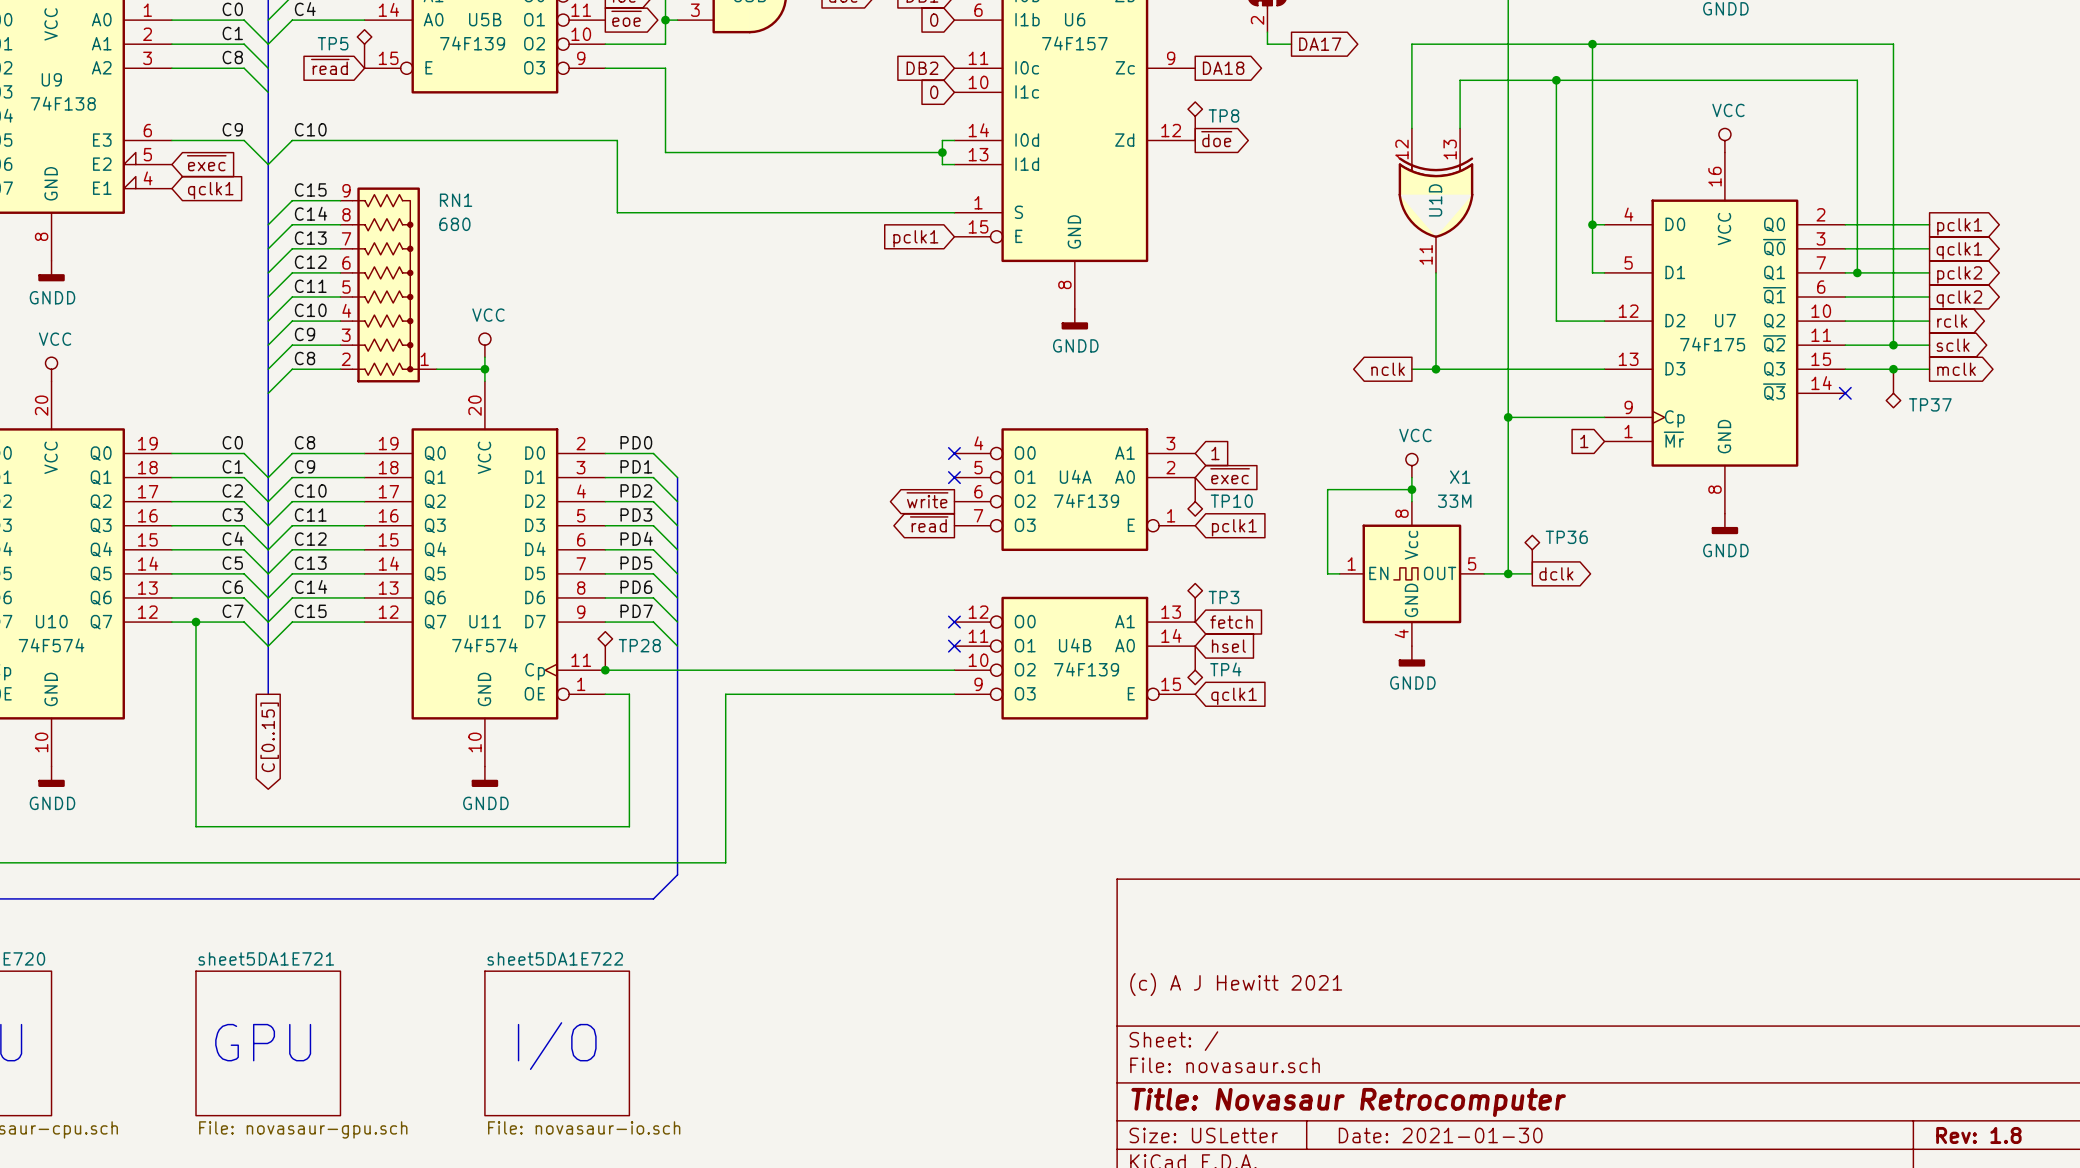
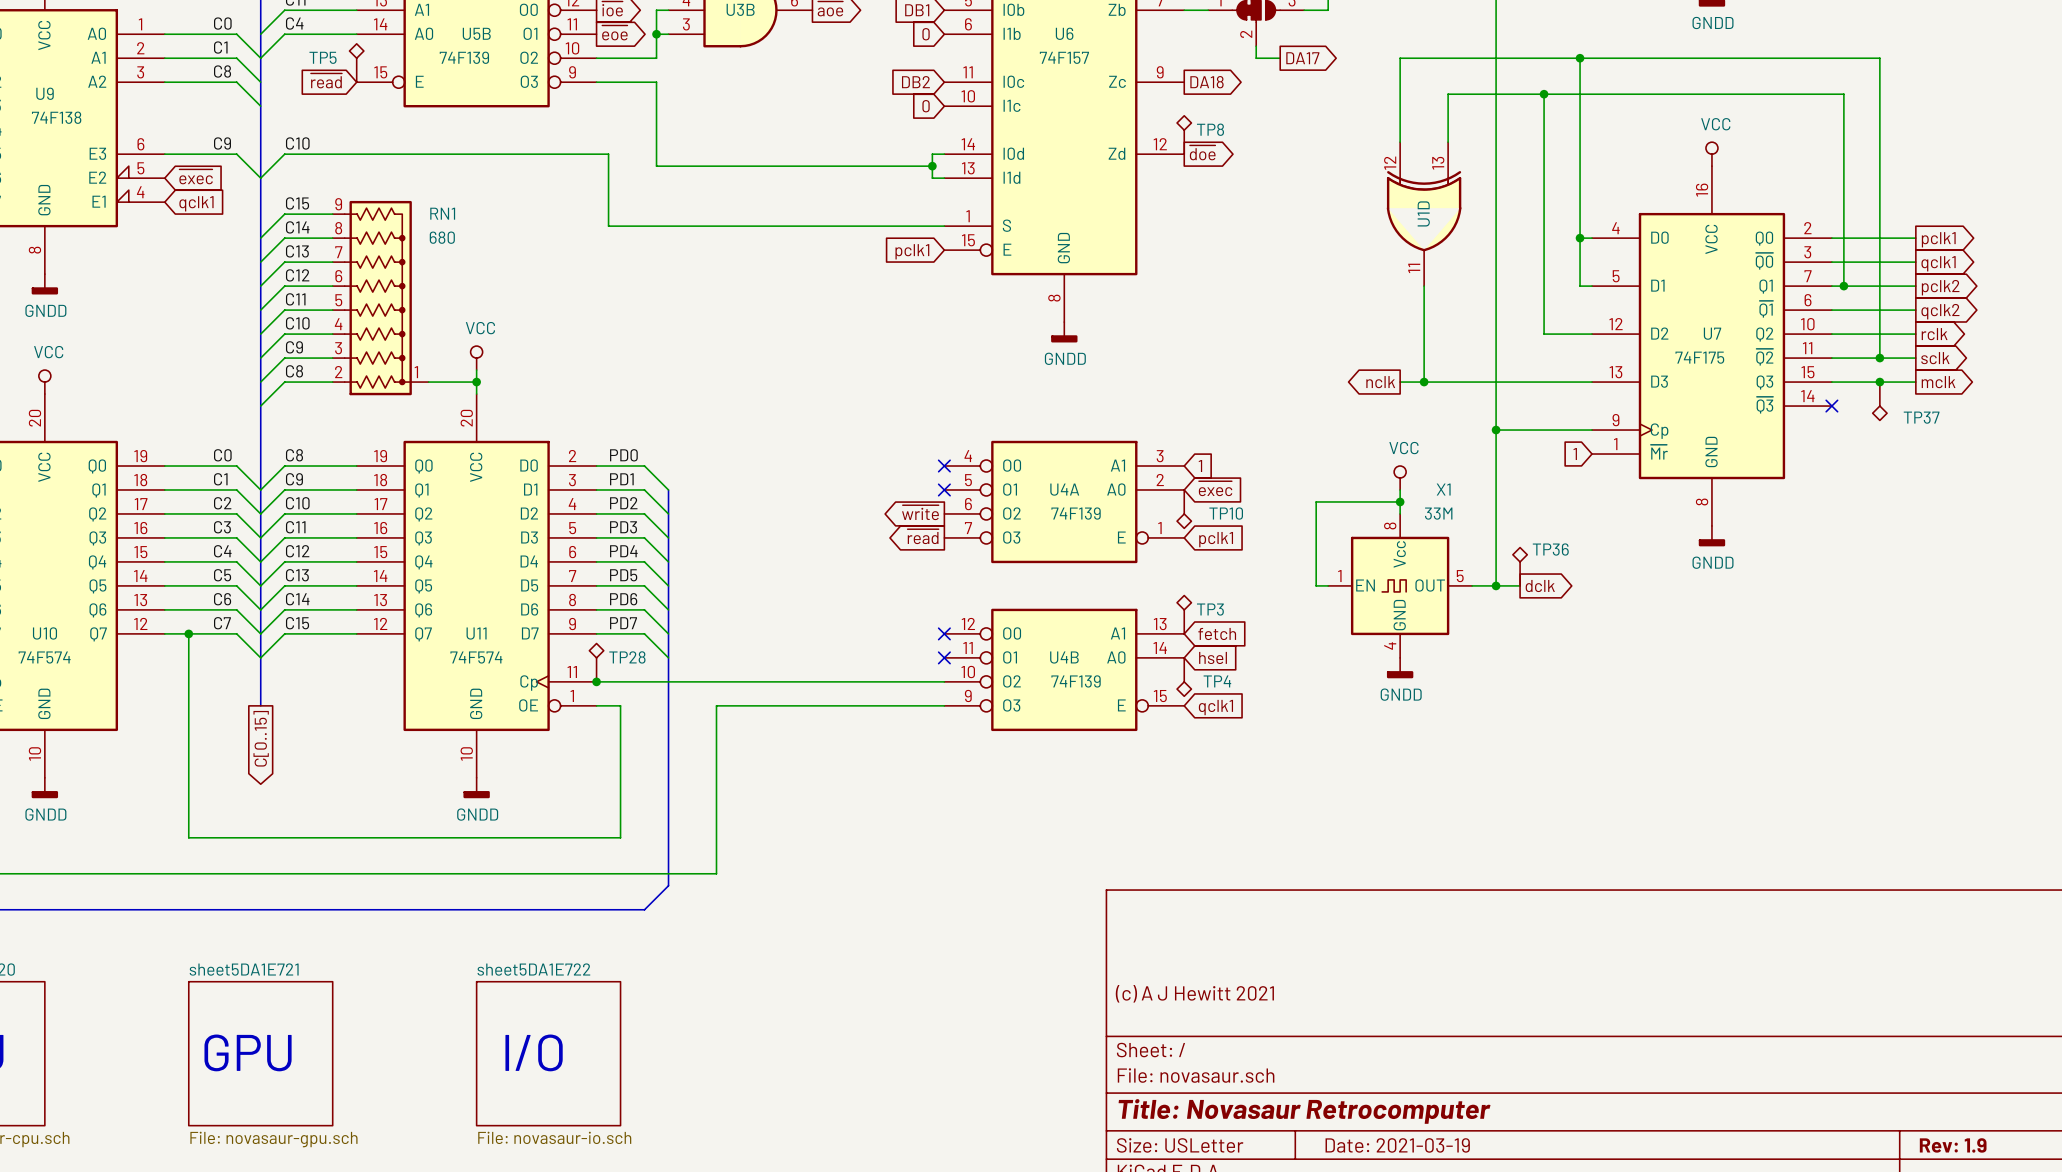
title block: Date: 2021-01-30 (1440, 1135) -> Date: 2021-03-19 (1397, 1145)
title block: Rev: 1.8 (1978, 1135) -> Rev: 1.9 (1953, 1145)

